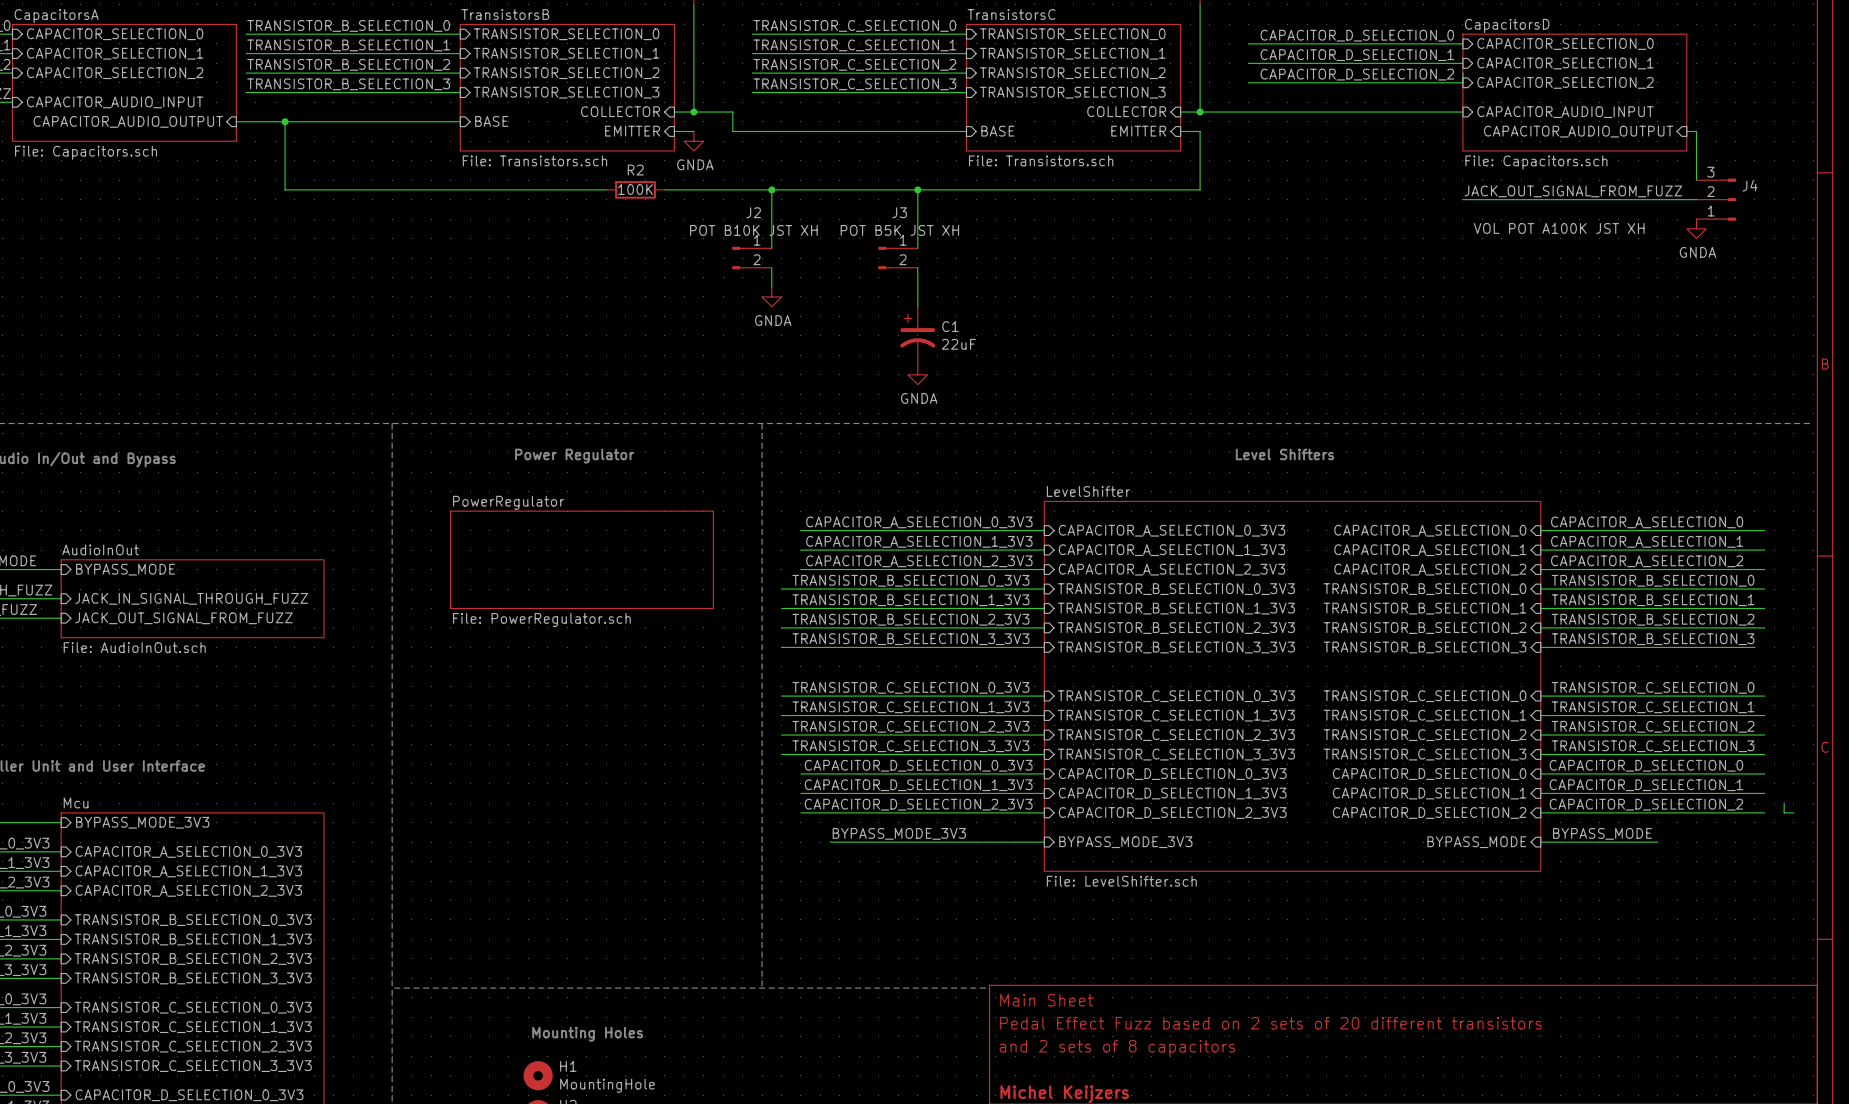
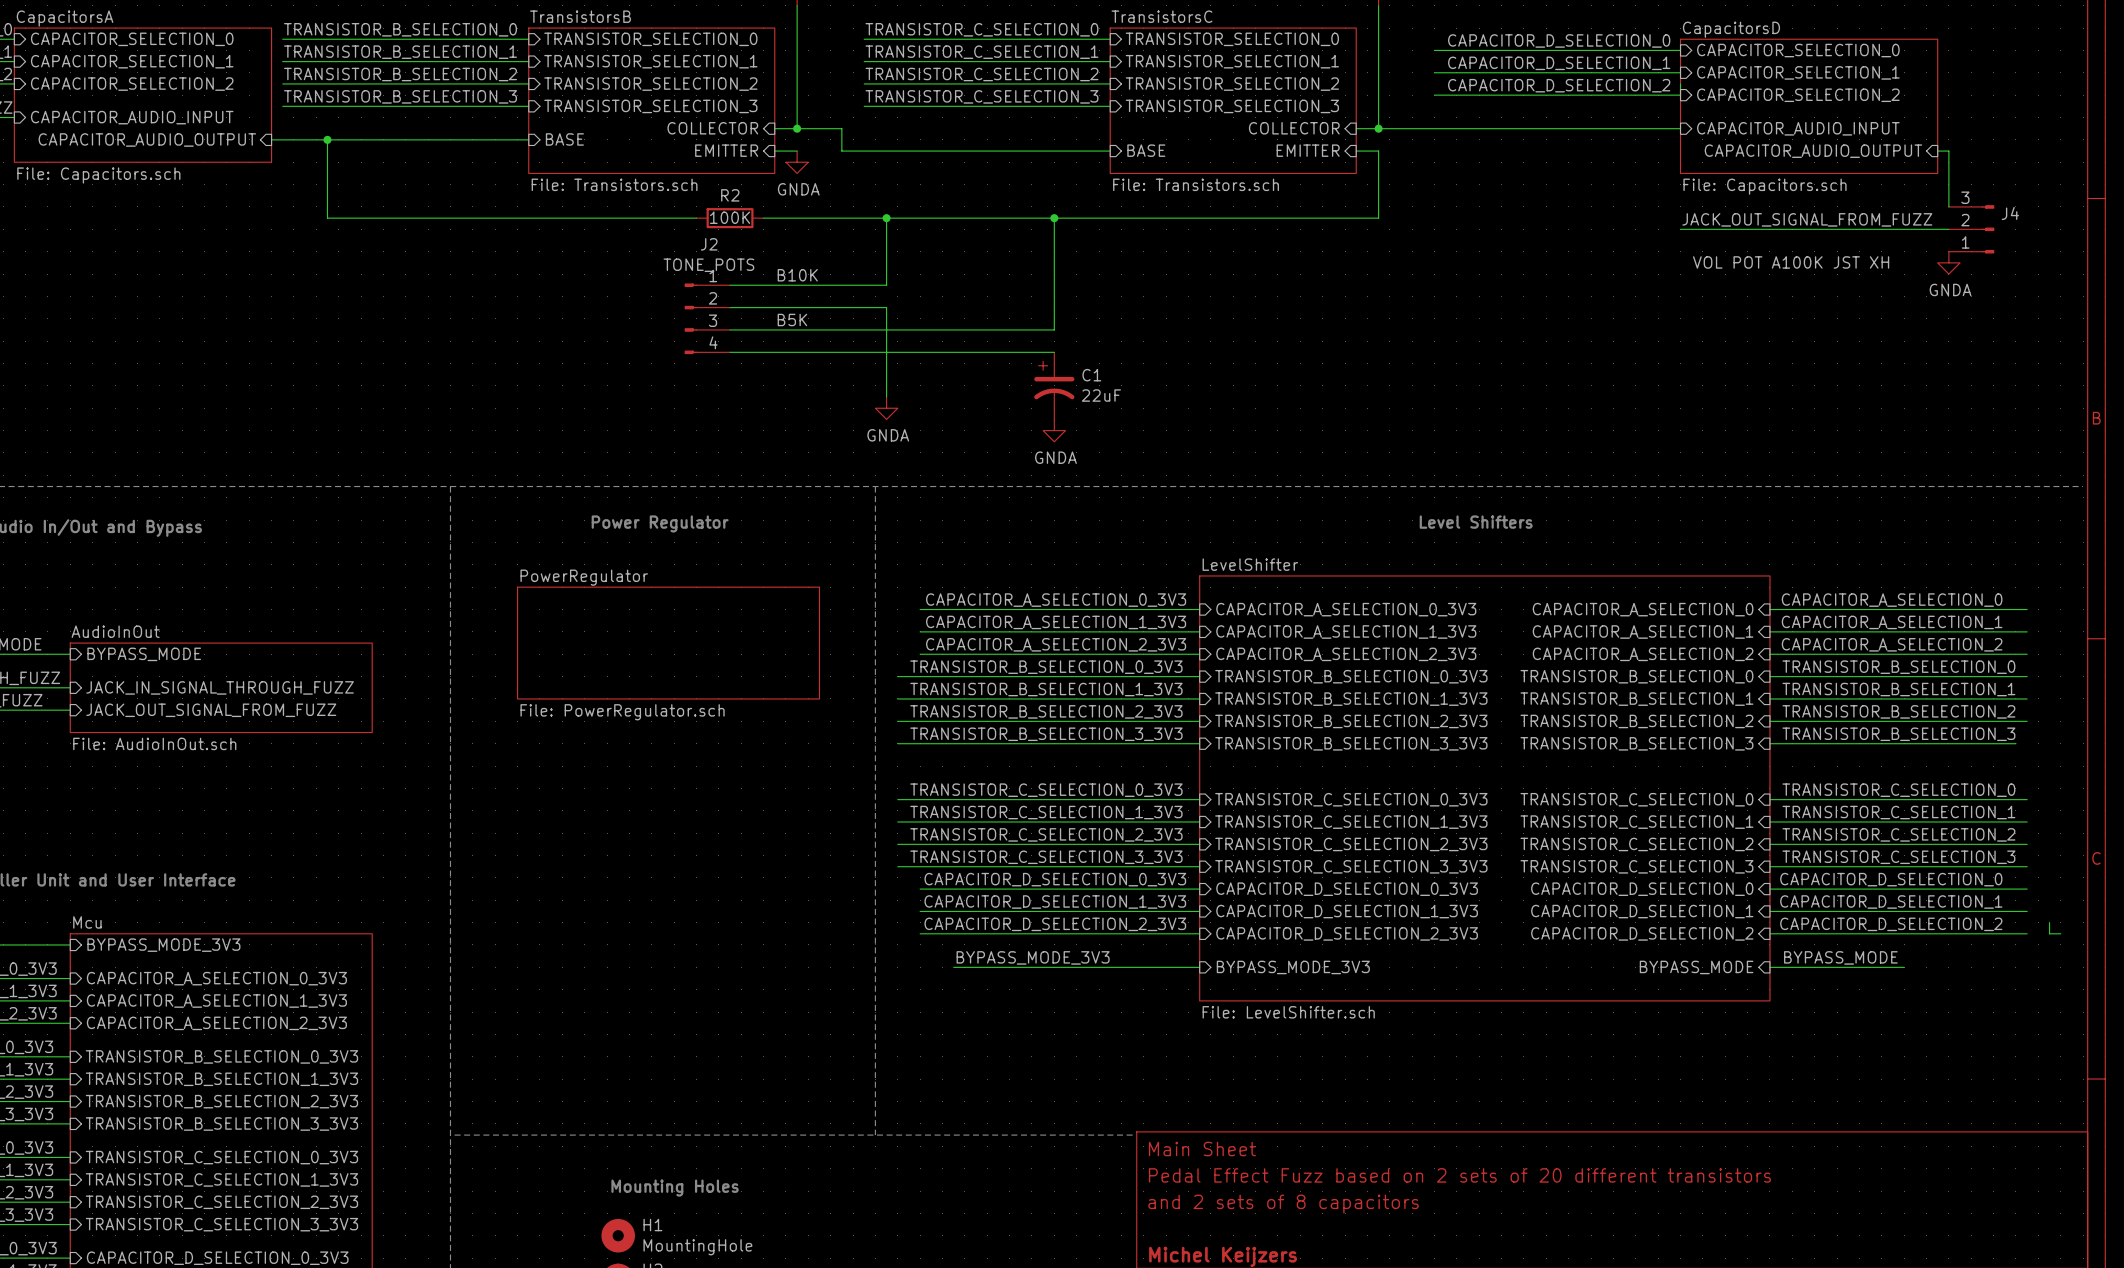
J2 name position: J2 (753, 212) -> J2 (709, 244)
J2 value: POT B10K JST XH (753, 230) -> TONE_POTS (708, 265)
label: none -> B10K (797, 275)
J2 symbol: [732, 246, 772, 270] -> [684, 283, 731, 355]
wire: none -> (730, 285) (886, 285)
wire: none -> (1054, 285) (1054, 307)
J3: POT B5K JST XH (898, 258) -> none
wire: none -> (730, 307) (886, 307)
label: none -> B5K (792, 319)
wire: none -> (886, 329) (886, 397)
wire: (917, 287) (917, 306) -> (1054, 329) (730, 329)
power symbol position: GNDA (771, 296) -> GNDA (886, 408)
wire: none -> (730, 352) (1054, 352)

